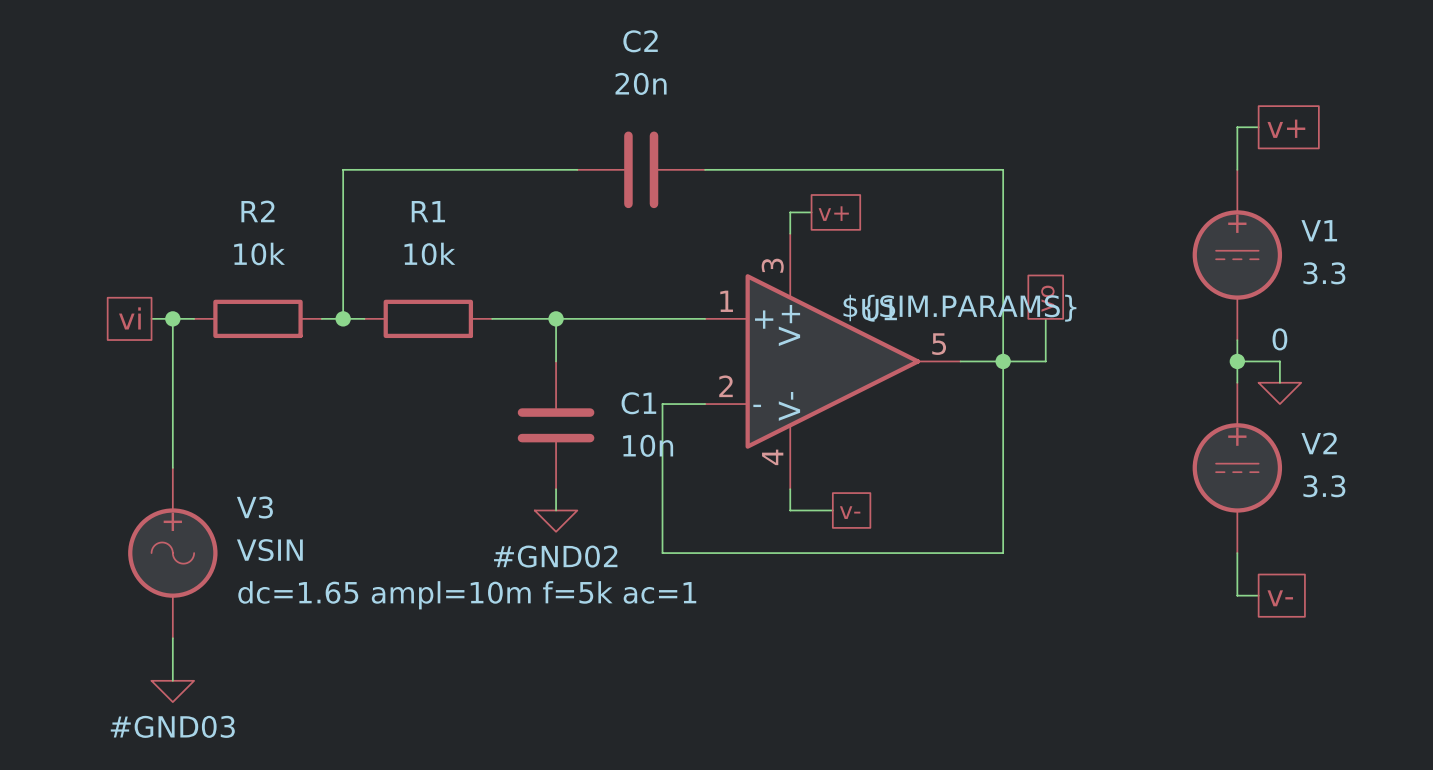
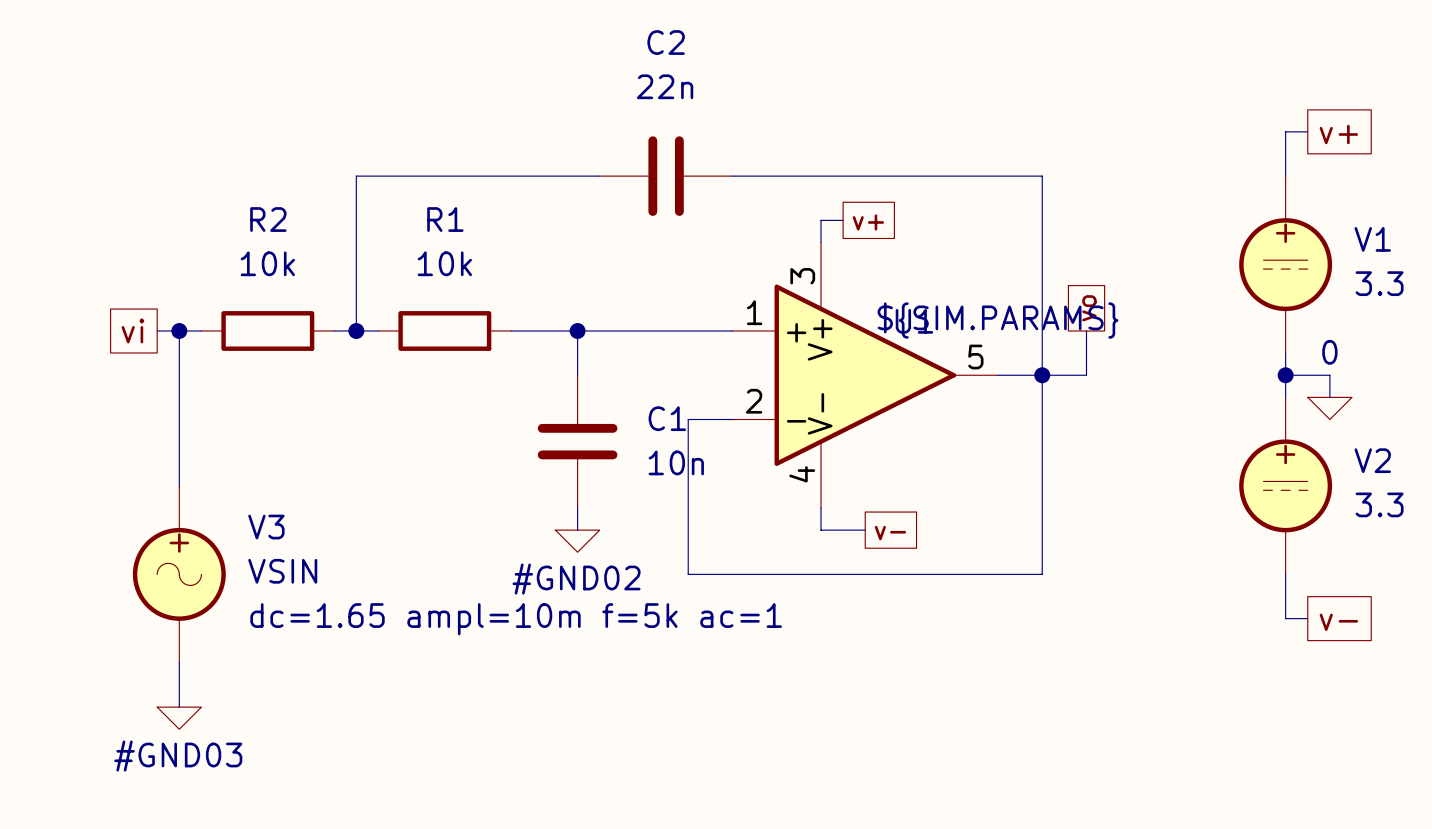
C2 value: 20n (641, 83) -> 22n (665, 86)

